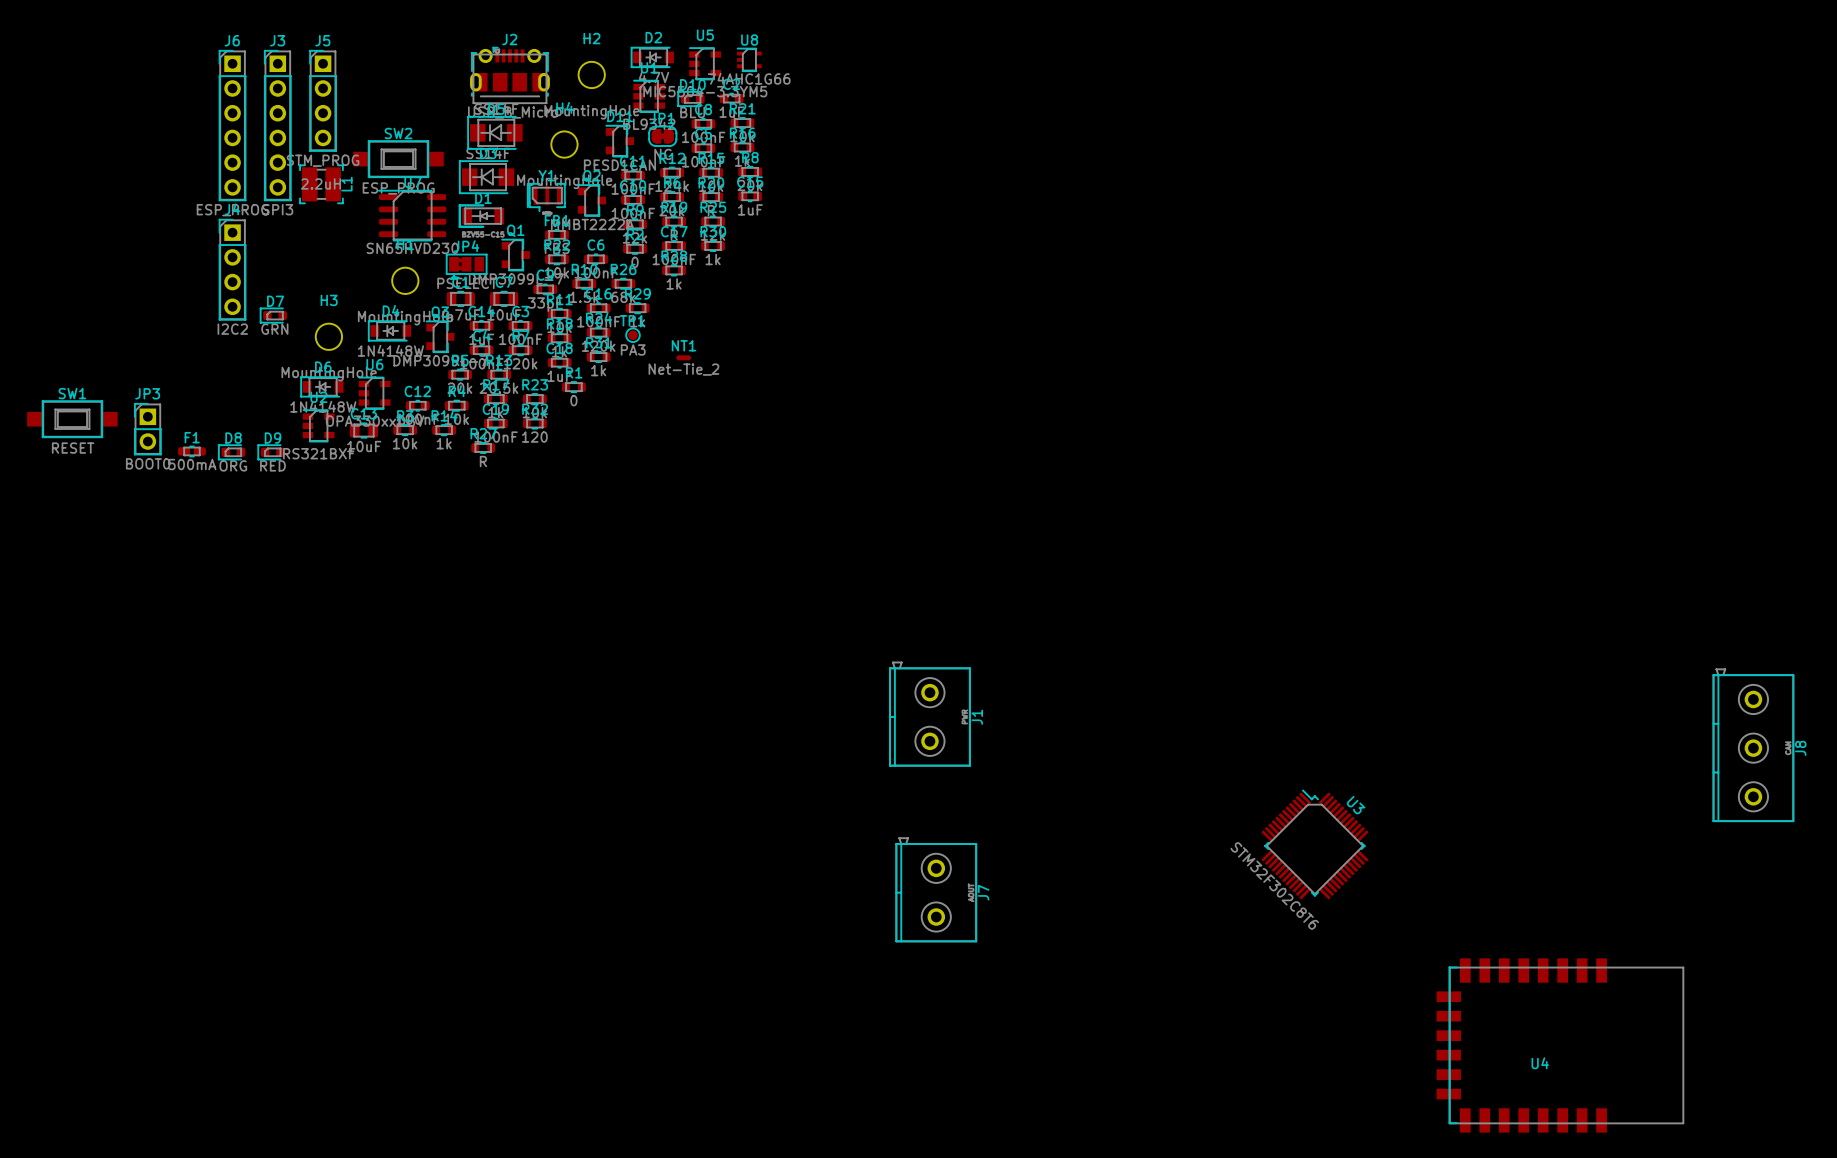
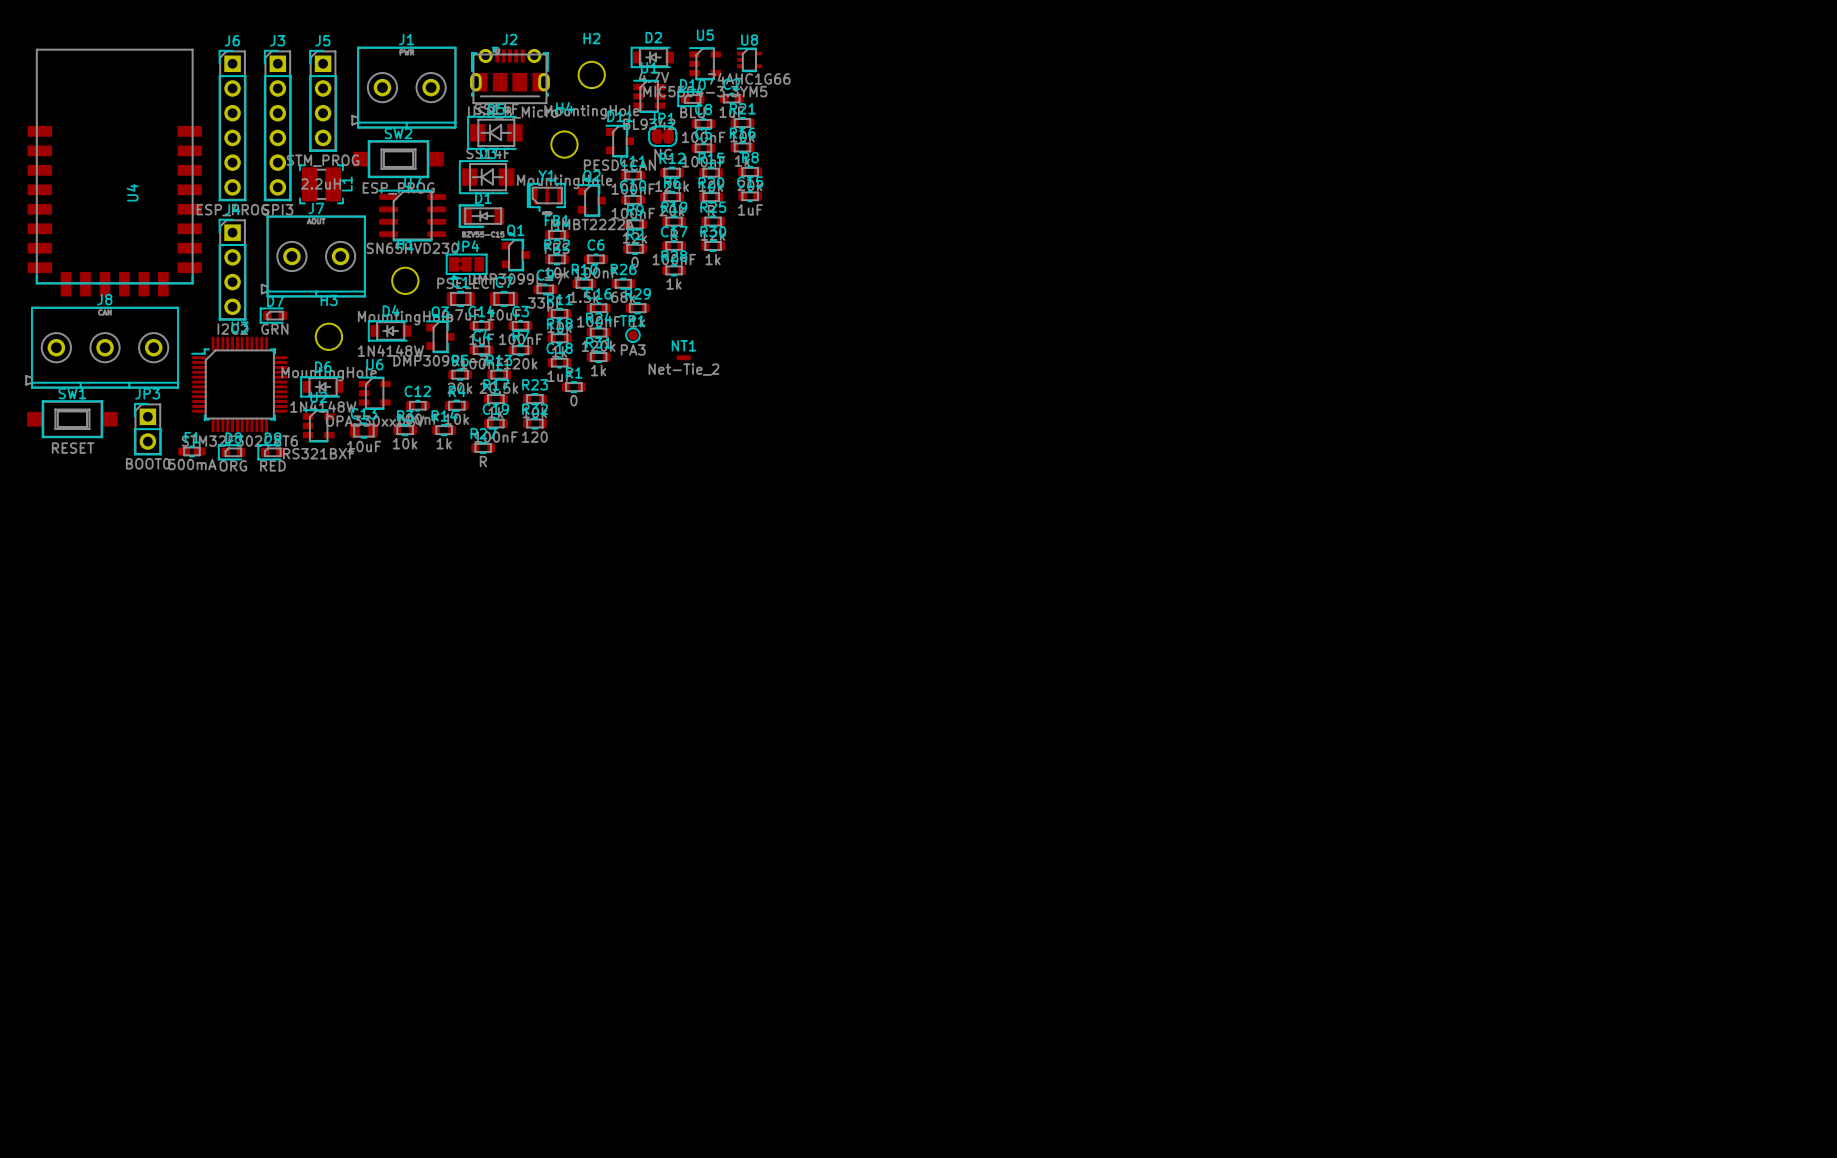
J1 rotation: 0° (929, 714) -> 90° counterclockwise (403, 87)
J1 position: (929, 714) -> (403, 87)
J8 rotation: 0° (1753, 745) -> 90° counterclockwise (102, 347)
J8 position: (1753, 745) -> (102, 347)
U3 rotation: 0° (1314, 844) -> 45° counterclockwise (239, 384)
U3 position: (1314, 844) -> (239, 384)
J7 rotation: 0° (936, 889) -> 90° counterclockwise (313, 256)
J7 position: (936, 889) -> (313, 256)
U4 rotation: 0° (1560, 1045) -> 90° counterclockwise (114, 172)
U4 position: (1560, 1045) -> (114, 172)

